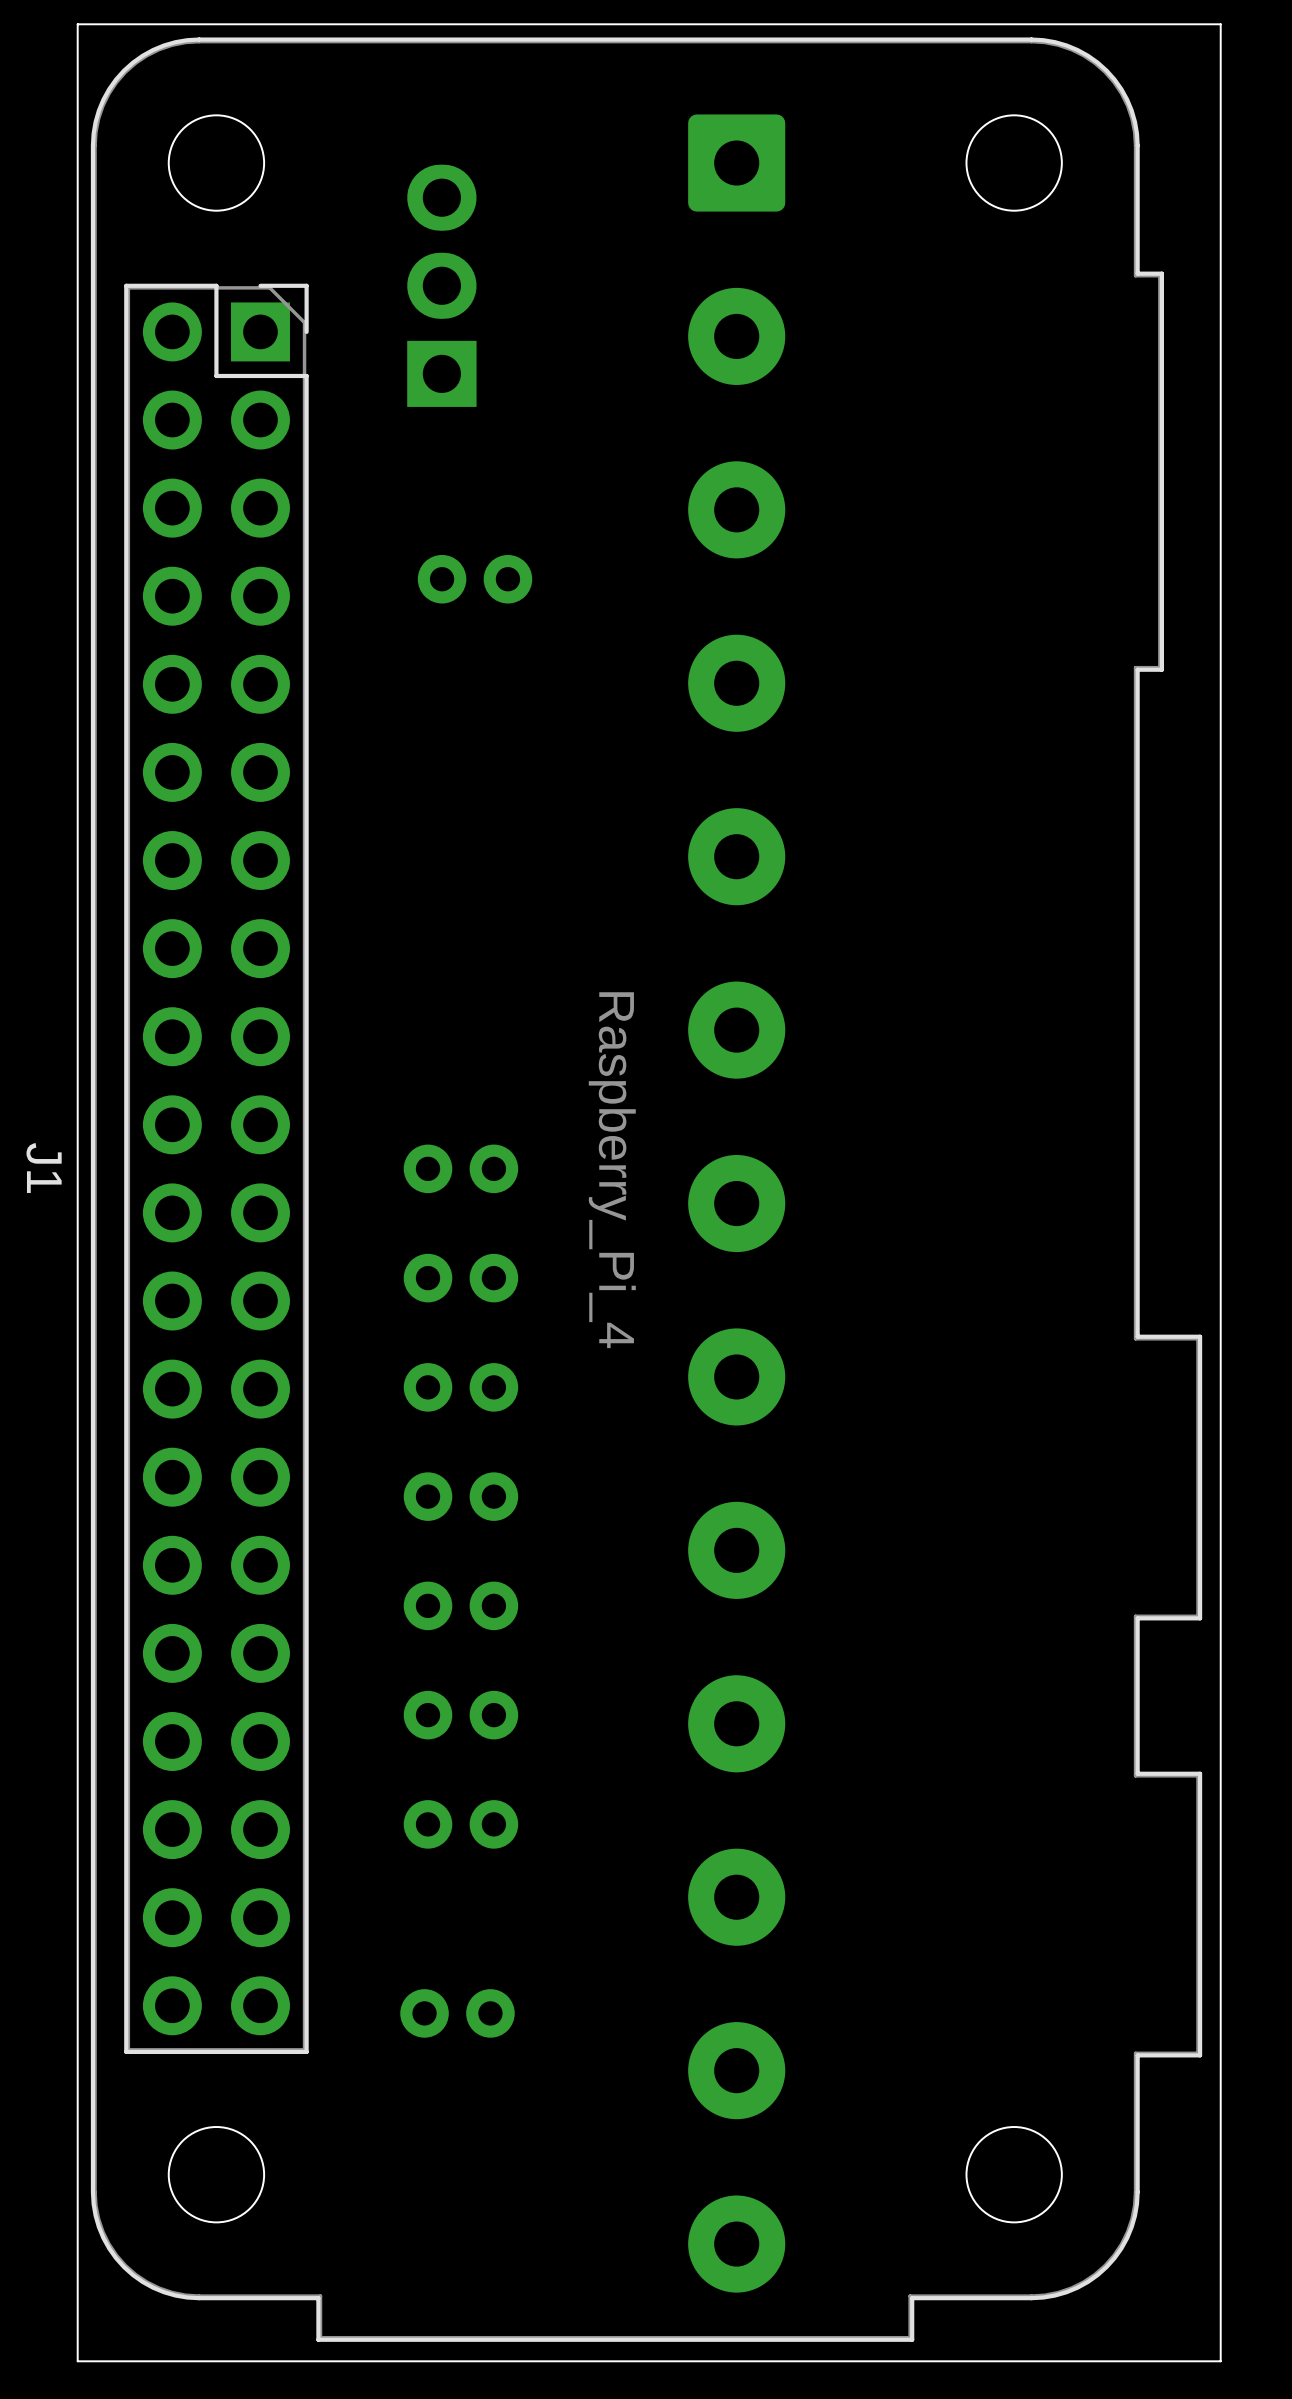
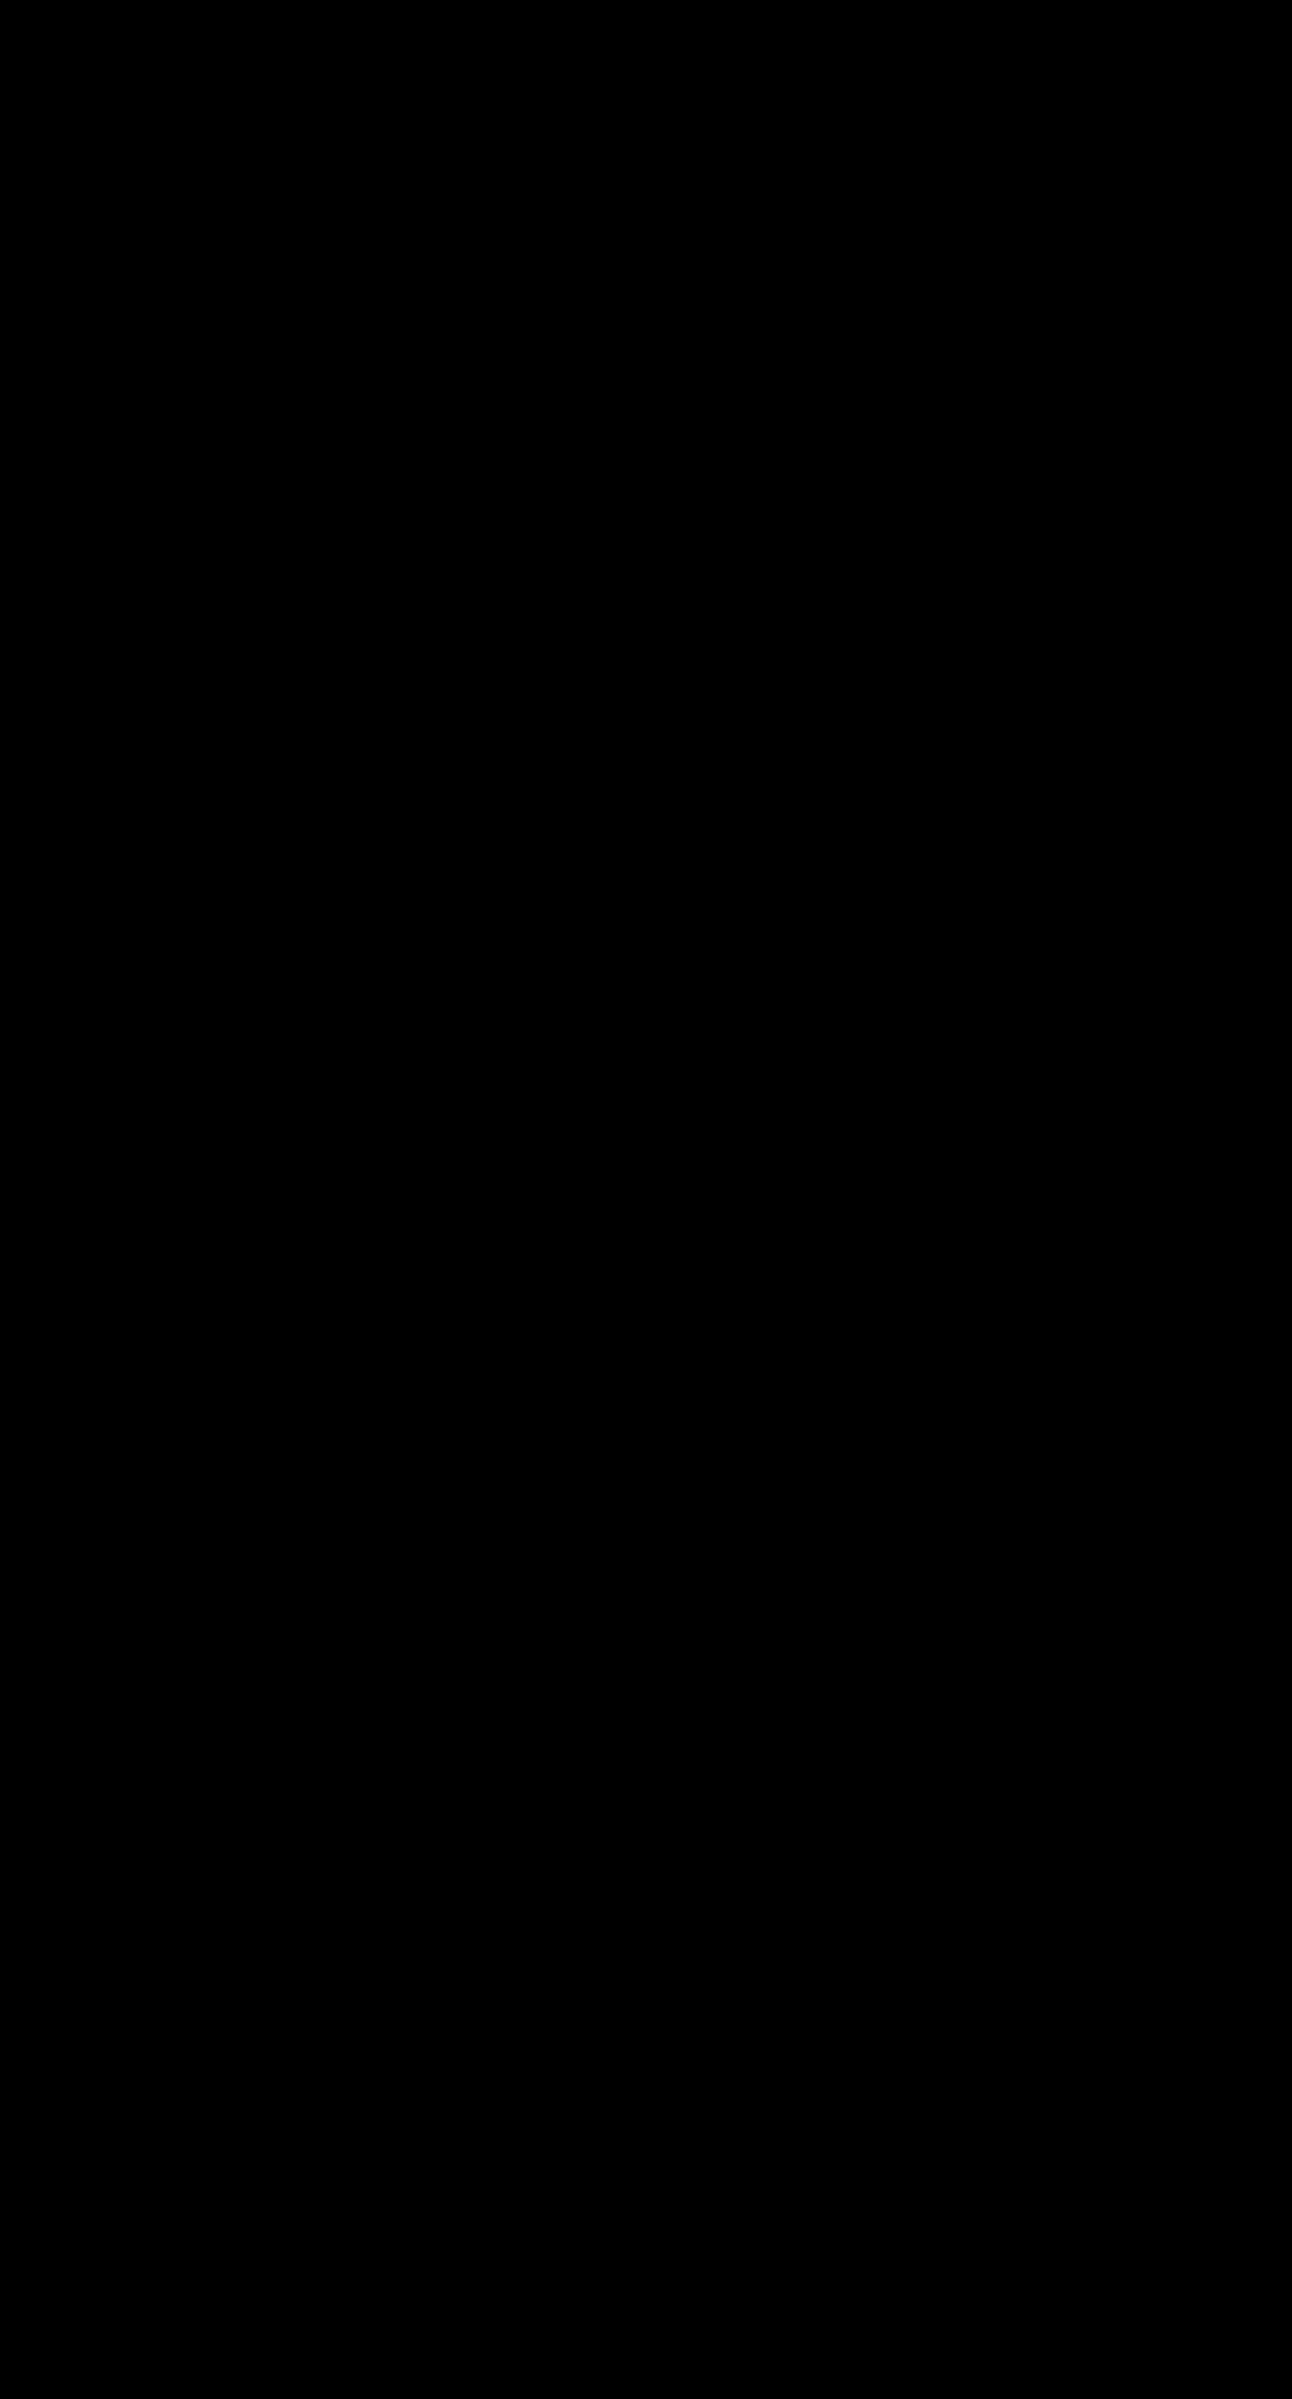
board edge: (1220, 24) (77, 24) (77, 2361) (1220, 2361) (1220, 24) -> none
part: (441, 285) -> none
part: (475, 579) -> none
part: (460, 1168) -> none
J1: Raspberry_Pi_4 (646, 1189) -> none
part: (736, 1203) -> none
part: (460, 1278) -> none
part: (460, 1387) -> none
part: (460, 1496) -> none
part: (460, 1605) -> none
part: (460, 1715) -> none
part: (460, 1824) -> none
part: (457, 2013) -> none

